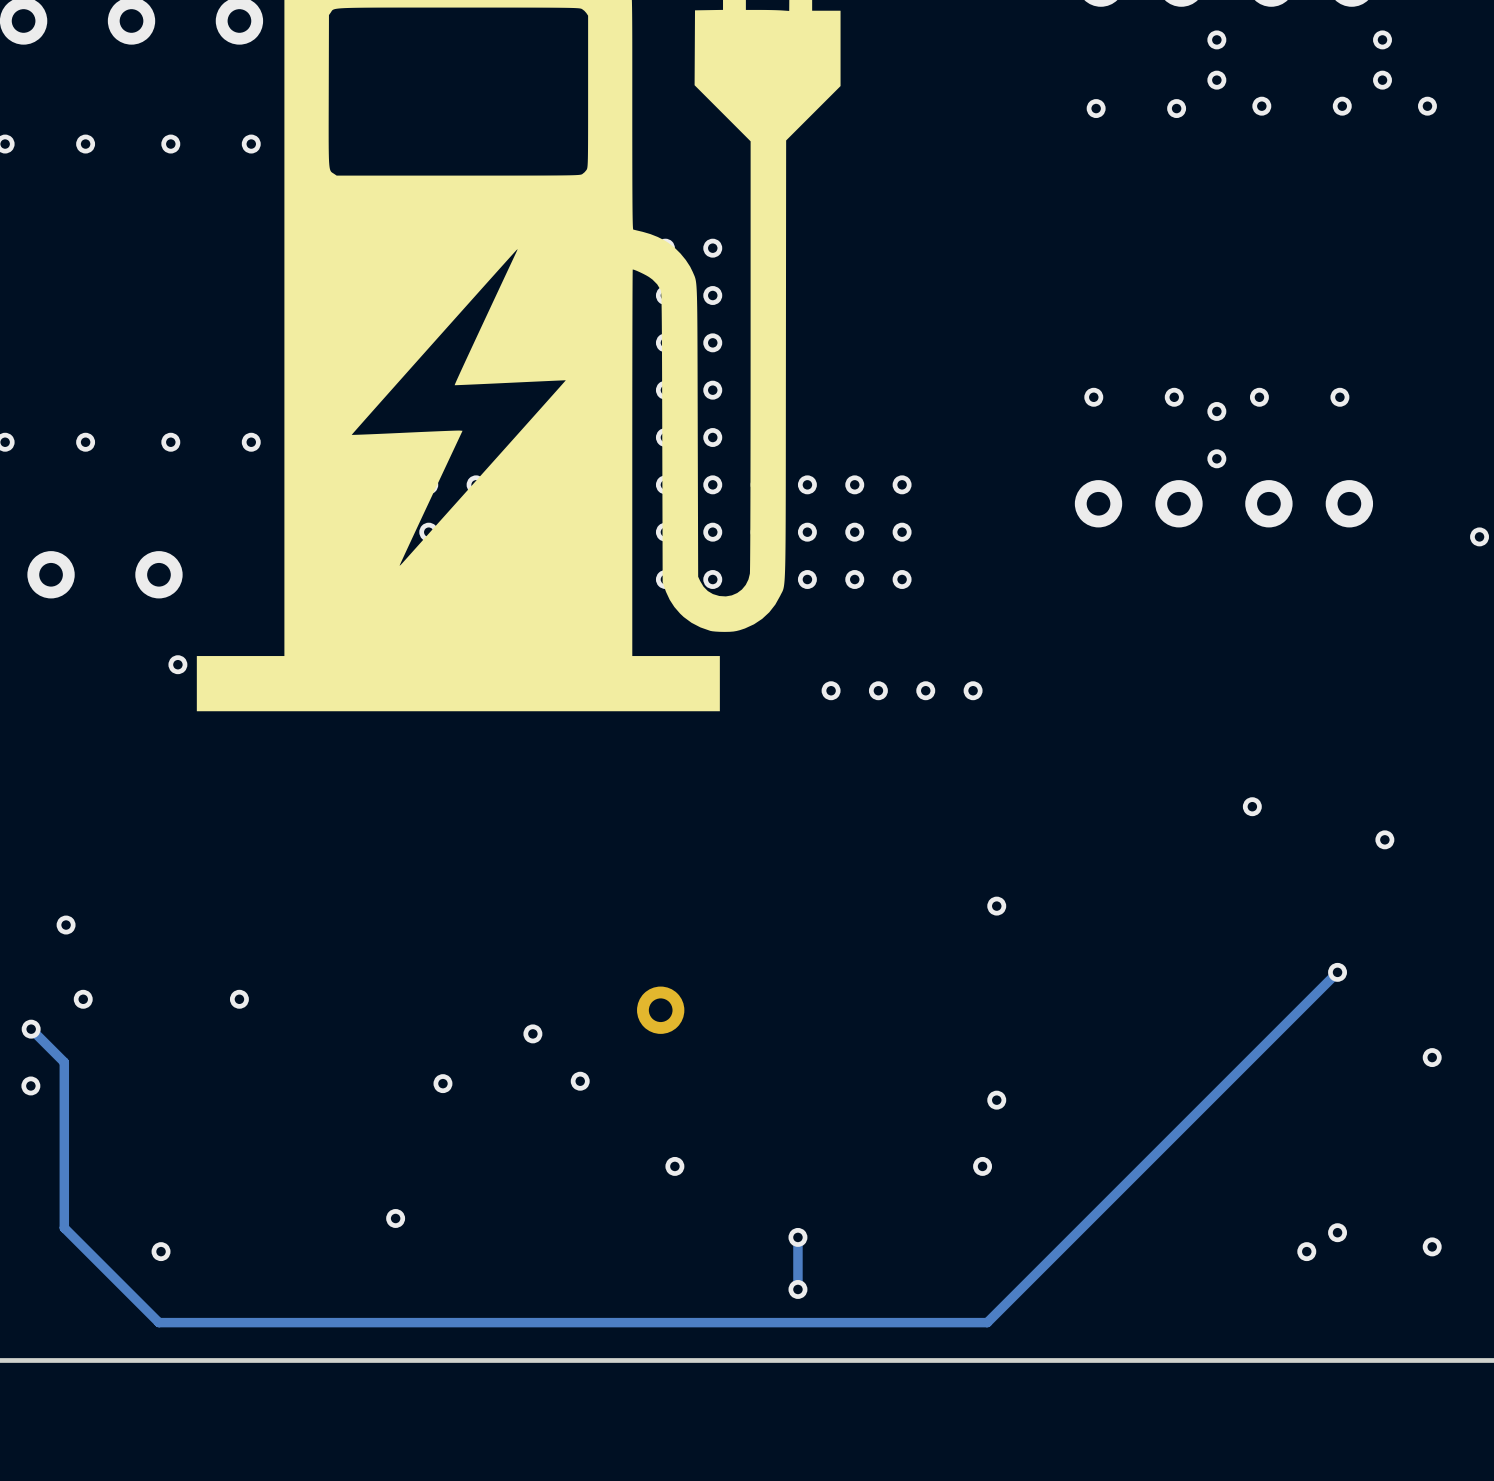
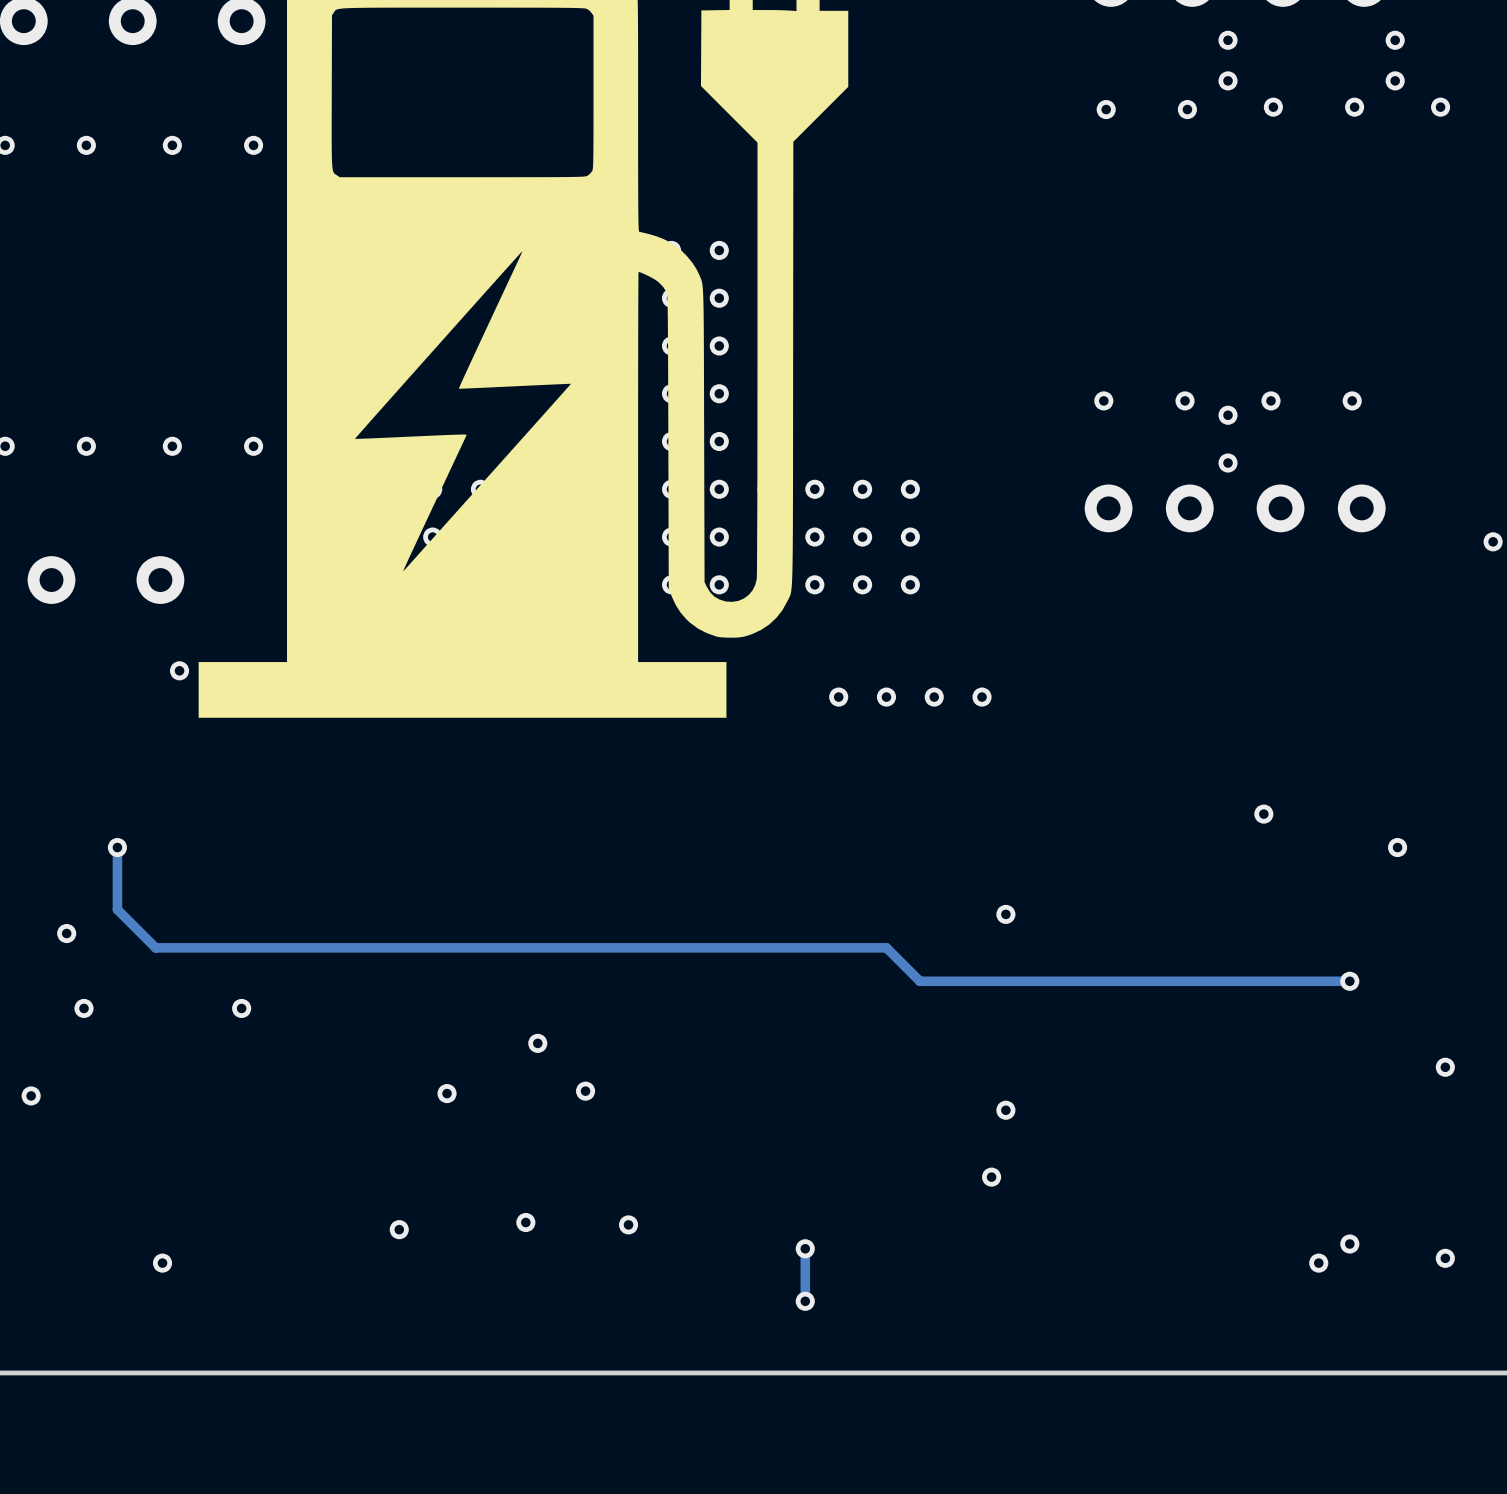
via: none -> (117, 847)
track: (1337, 972) (987, 1322) (158, 1322) (64, 1227) (64, 1062) (31, 1029) -> (1349, 981) (919, 981) (886, 947) (155, 947) (117, 909) (117, 847)
part: (660, 1010) -> none
via: (31, 1029) -> none
via position: (674, 1166) -> (628, 1224)
via: none -> (525, 1222)

